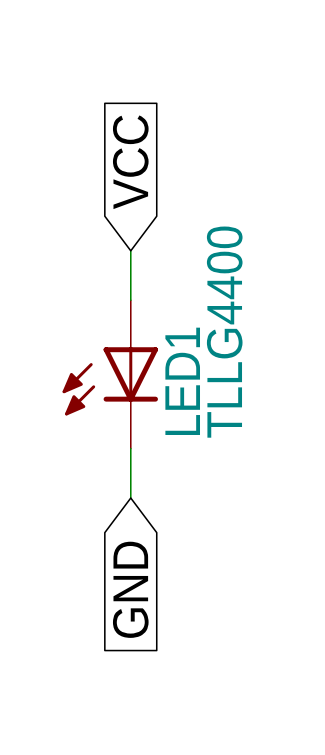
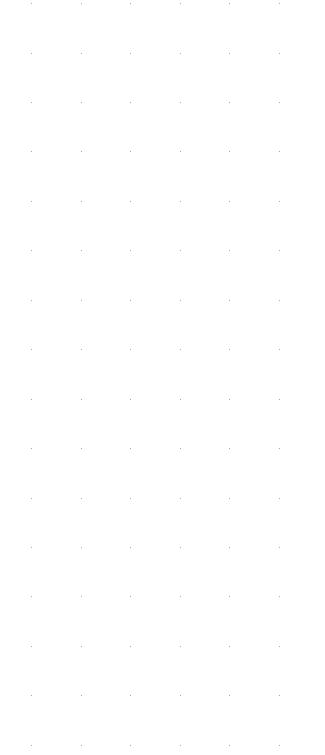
global label: VCC (130, 162) -> none
wire: (130, 250) (130, 300) -> none
LED1: TLLG4400 (110, 374) -> none
wire: (130, 448) (130, 498) -> none
global label: GND (130, 589) -> none

